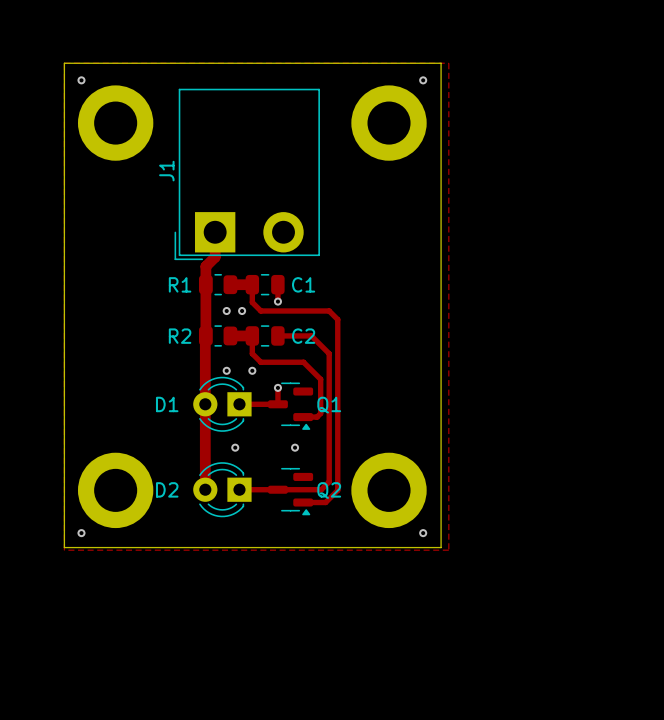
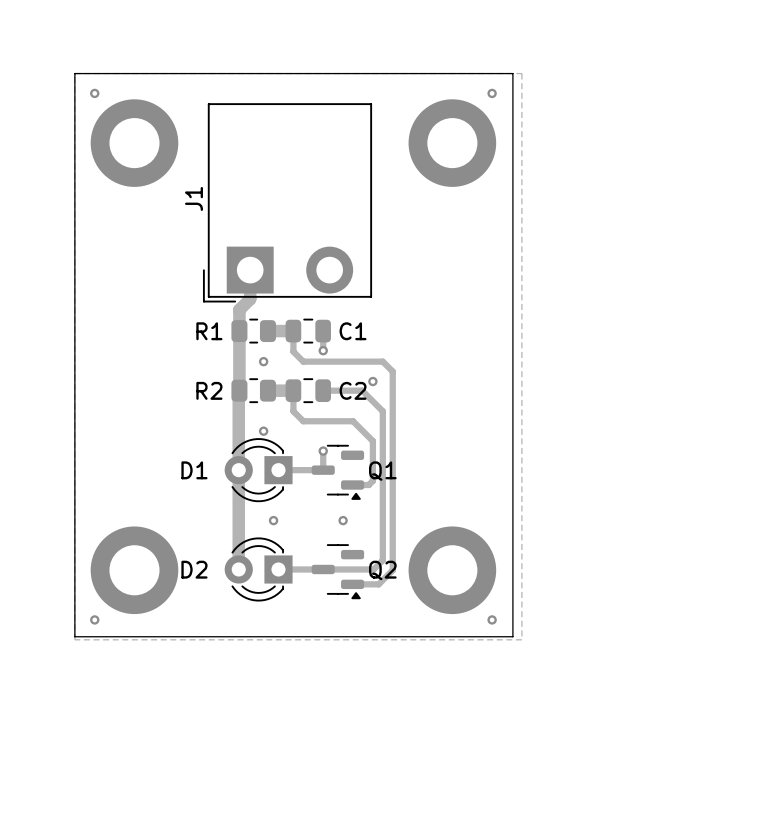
via: (242, 311) -> none
via: none -> (372, 381)
via: (252, 370) -> none

